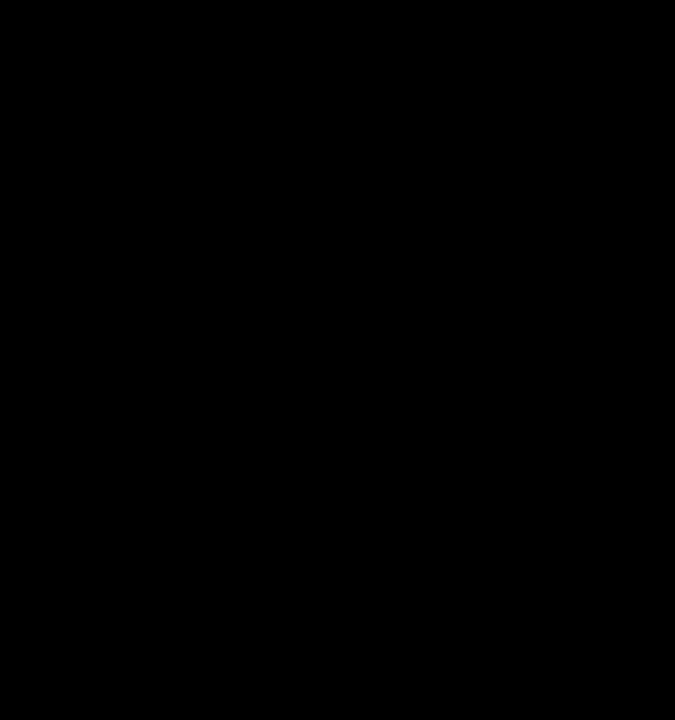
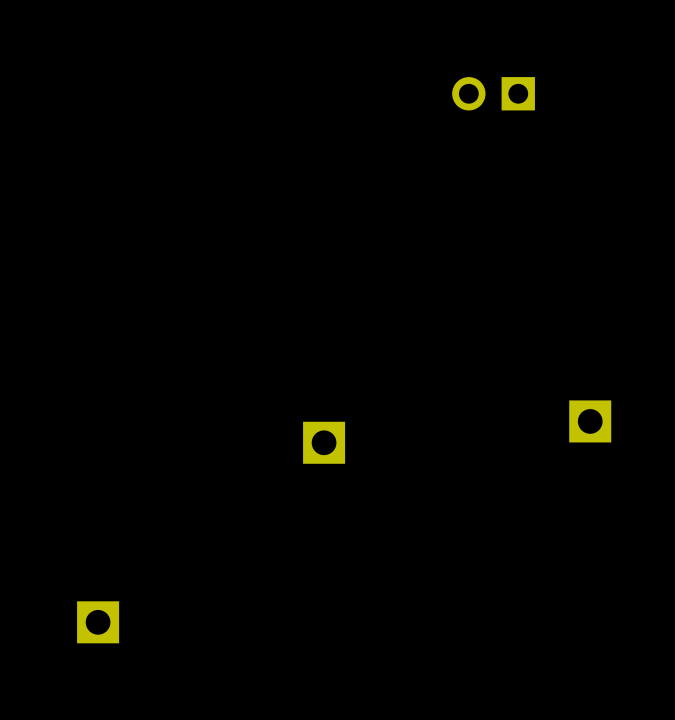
part: none -> (493, 93)
part: none -> (590, 421)
part: none -> (324, 442)
part: none -> (98, 622)

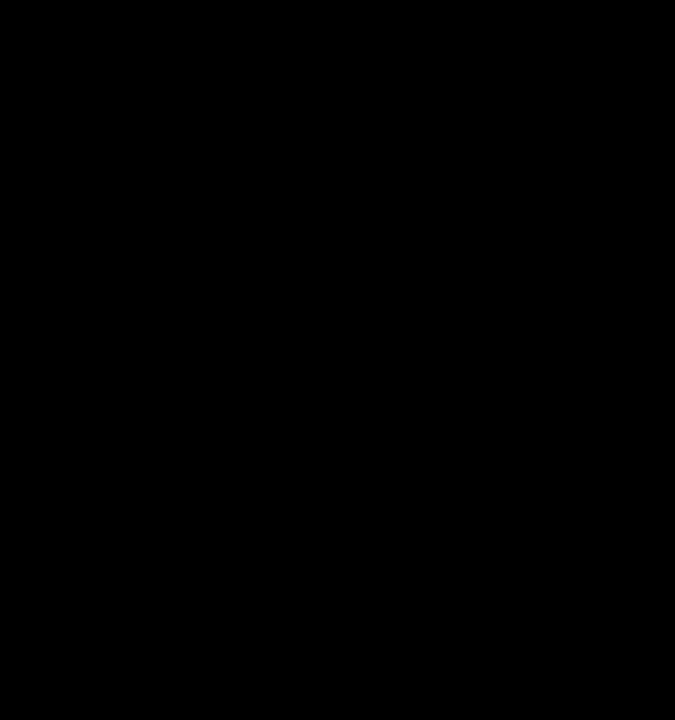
part: (493, 93) -> none
part: (590, 421) -> none
part: (324, 442) -> none
part: (98, 622) -> none

